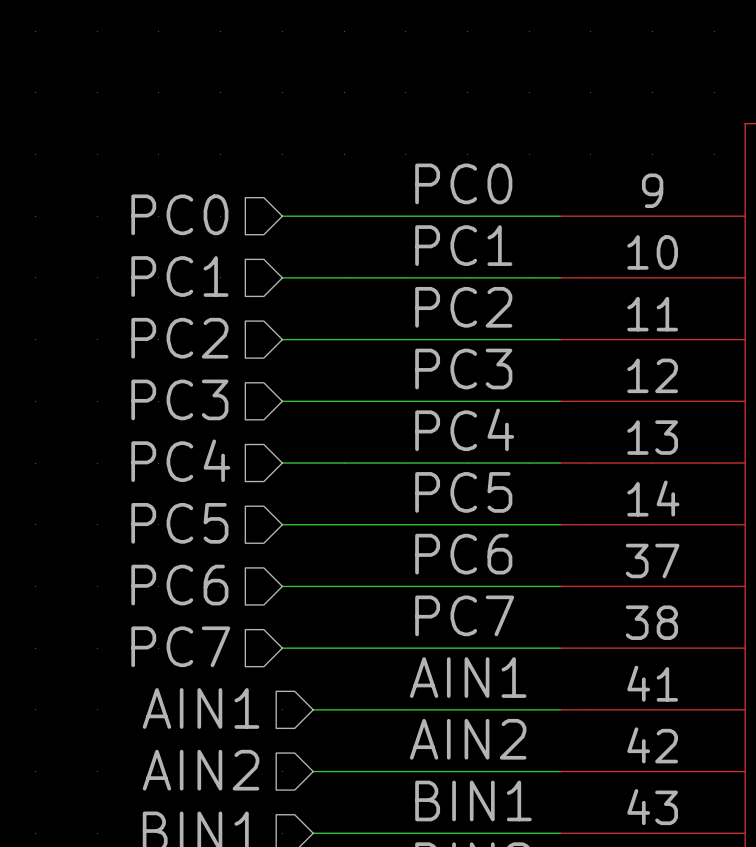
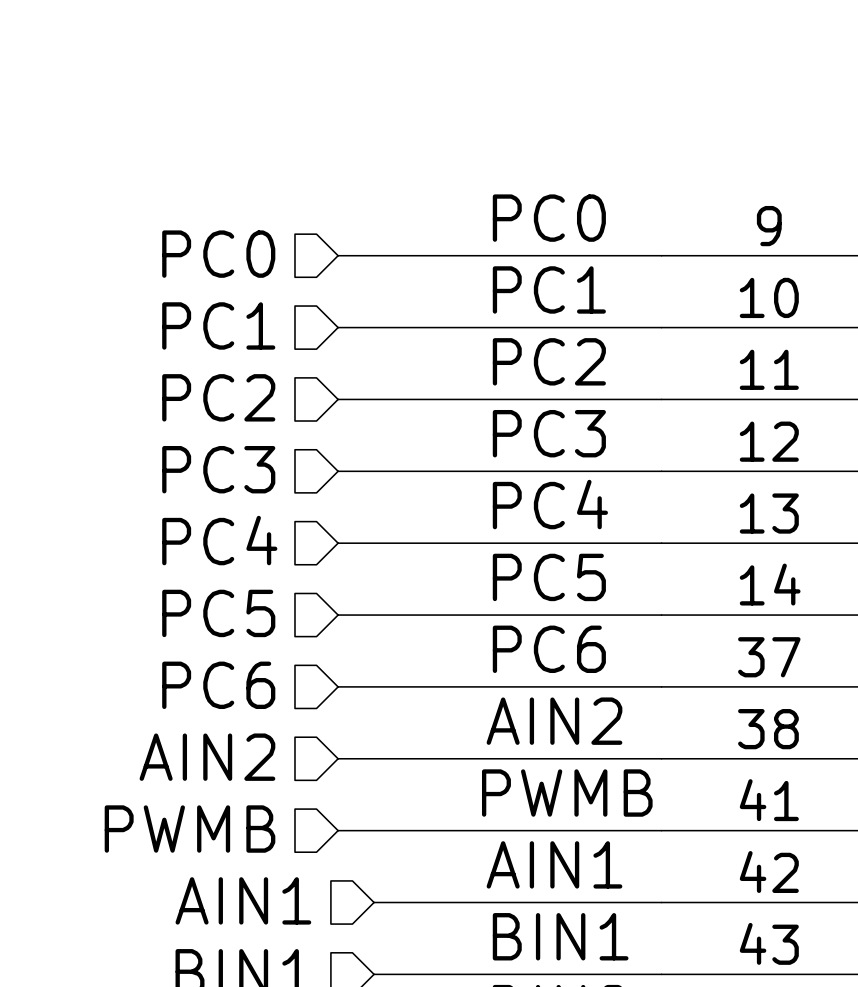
label: PC7 (464, 615) -> AIN2 (554, 721)
hierarchical label: PC7 (180, 646) -> AIN2 (207, 757)
label: AIN1 (468, 677) -> none
label: none -> PWMB (567, 793)
hierarchical label: none -> PWMB (190, 829)
hierarchical label: AIN1 (201, 708) -> none
wire: none -> (338, 830) (374, 830)
label: AIN2 (468, 739) -> AIN1 (554, 864)
hierarchical label: AIN2 (201, 770) -> AIN1 (243, 900)

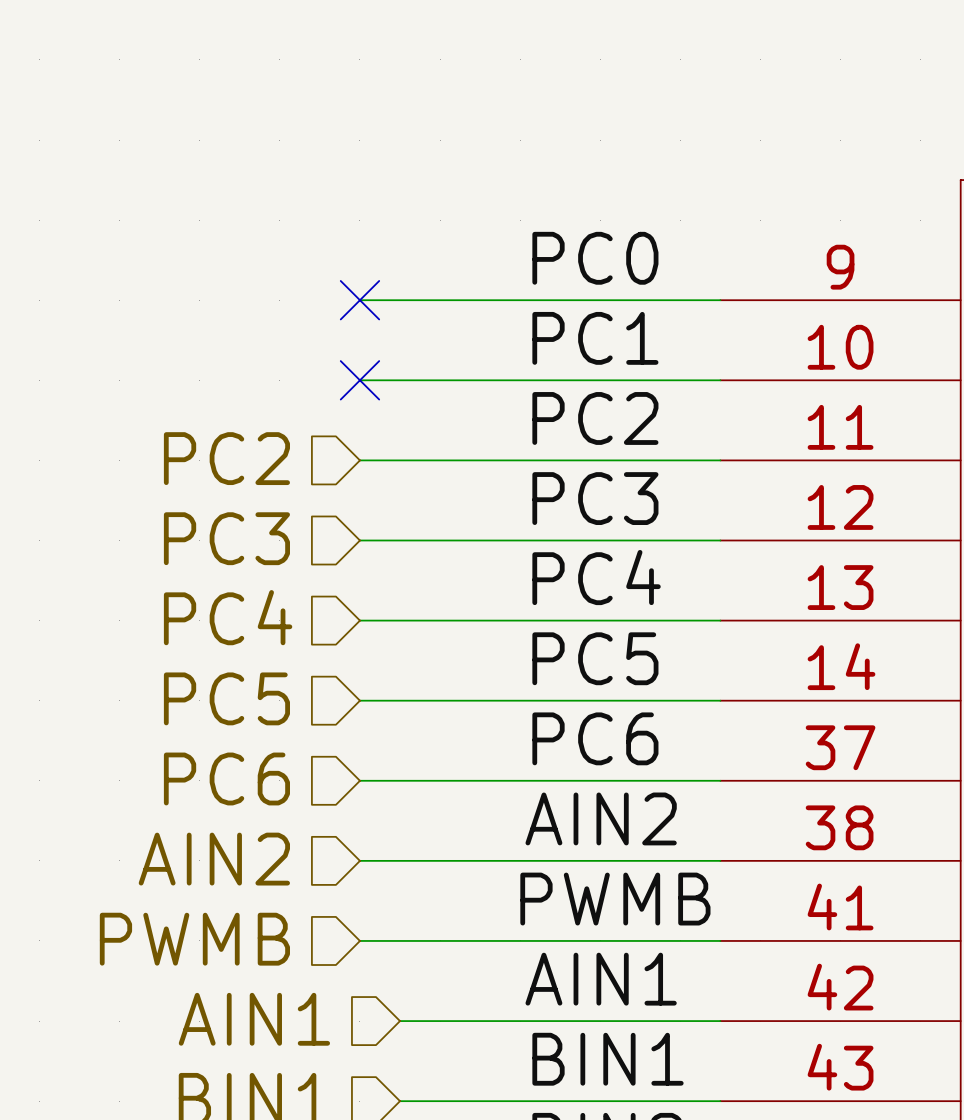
hierarchical label: PC0 (218, 254) -> none
no-connect mark: none -> (359, 300)
hierarchical label: PC1 (218, 325) -> none
no-connect mark: none -> (359, 380)

